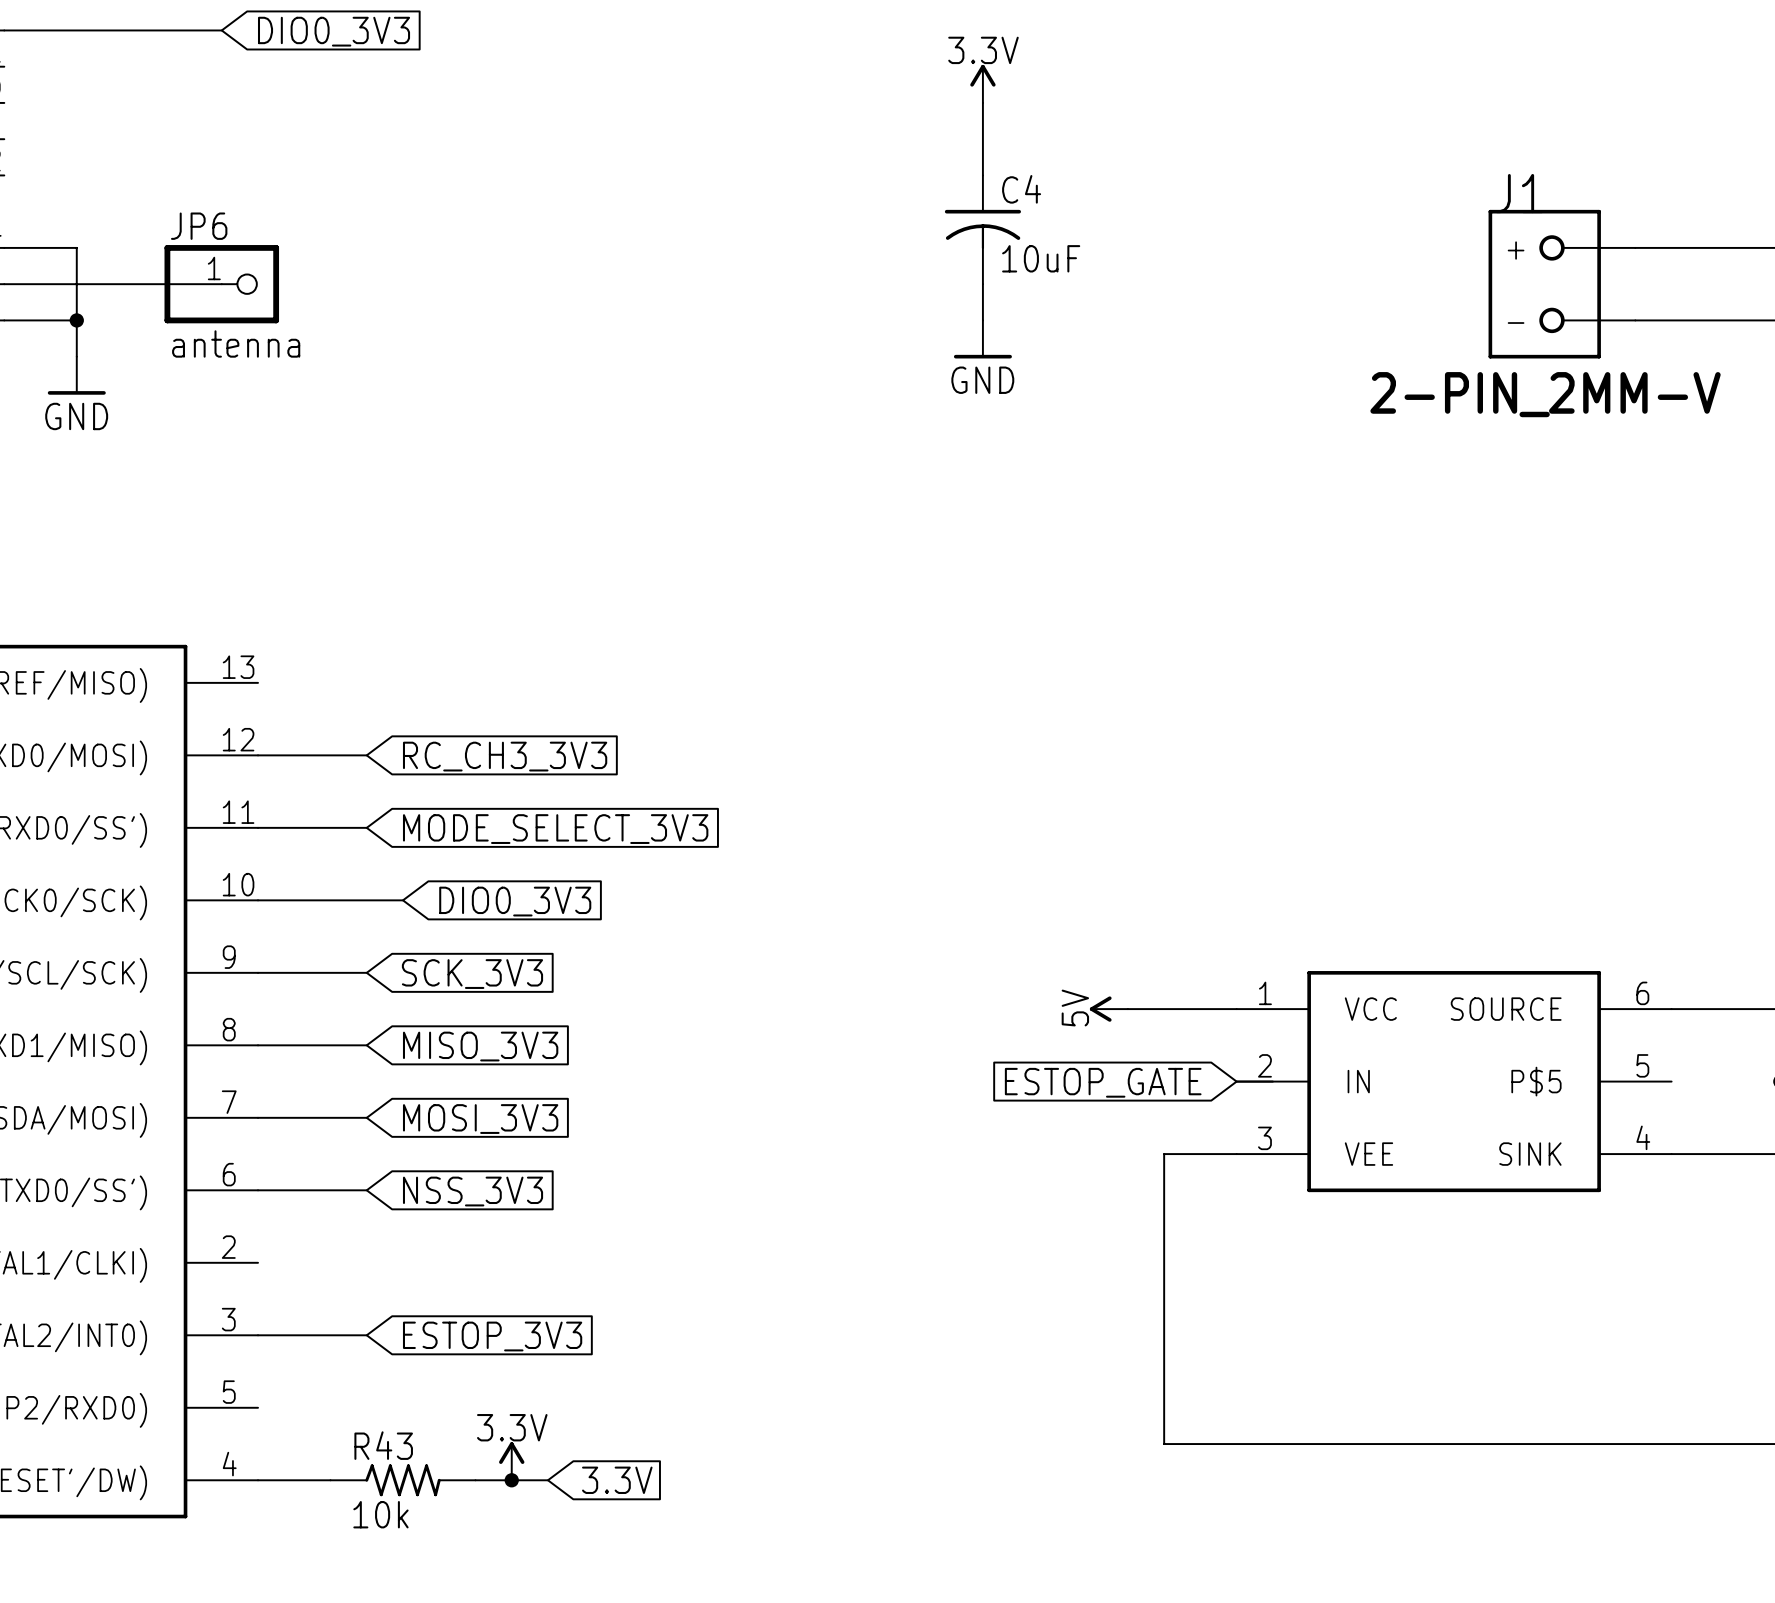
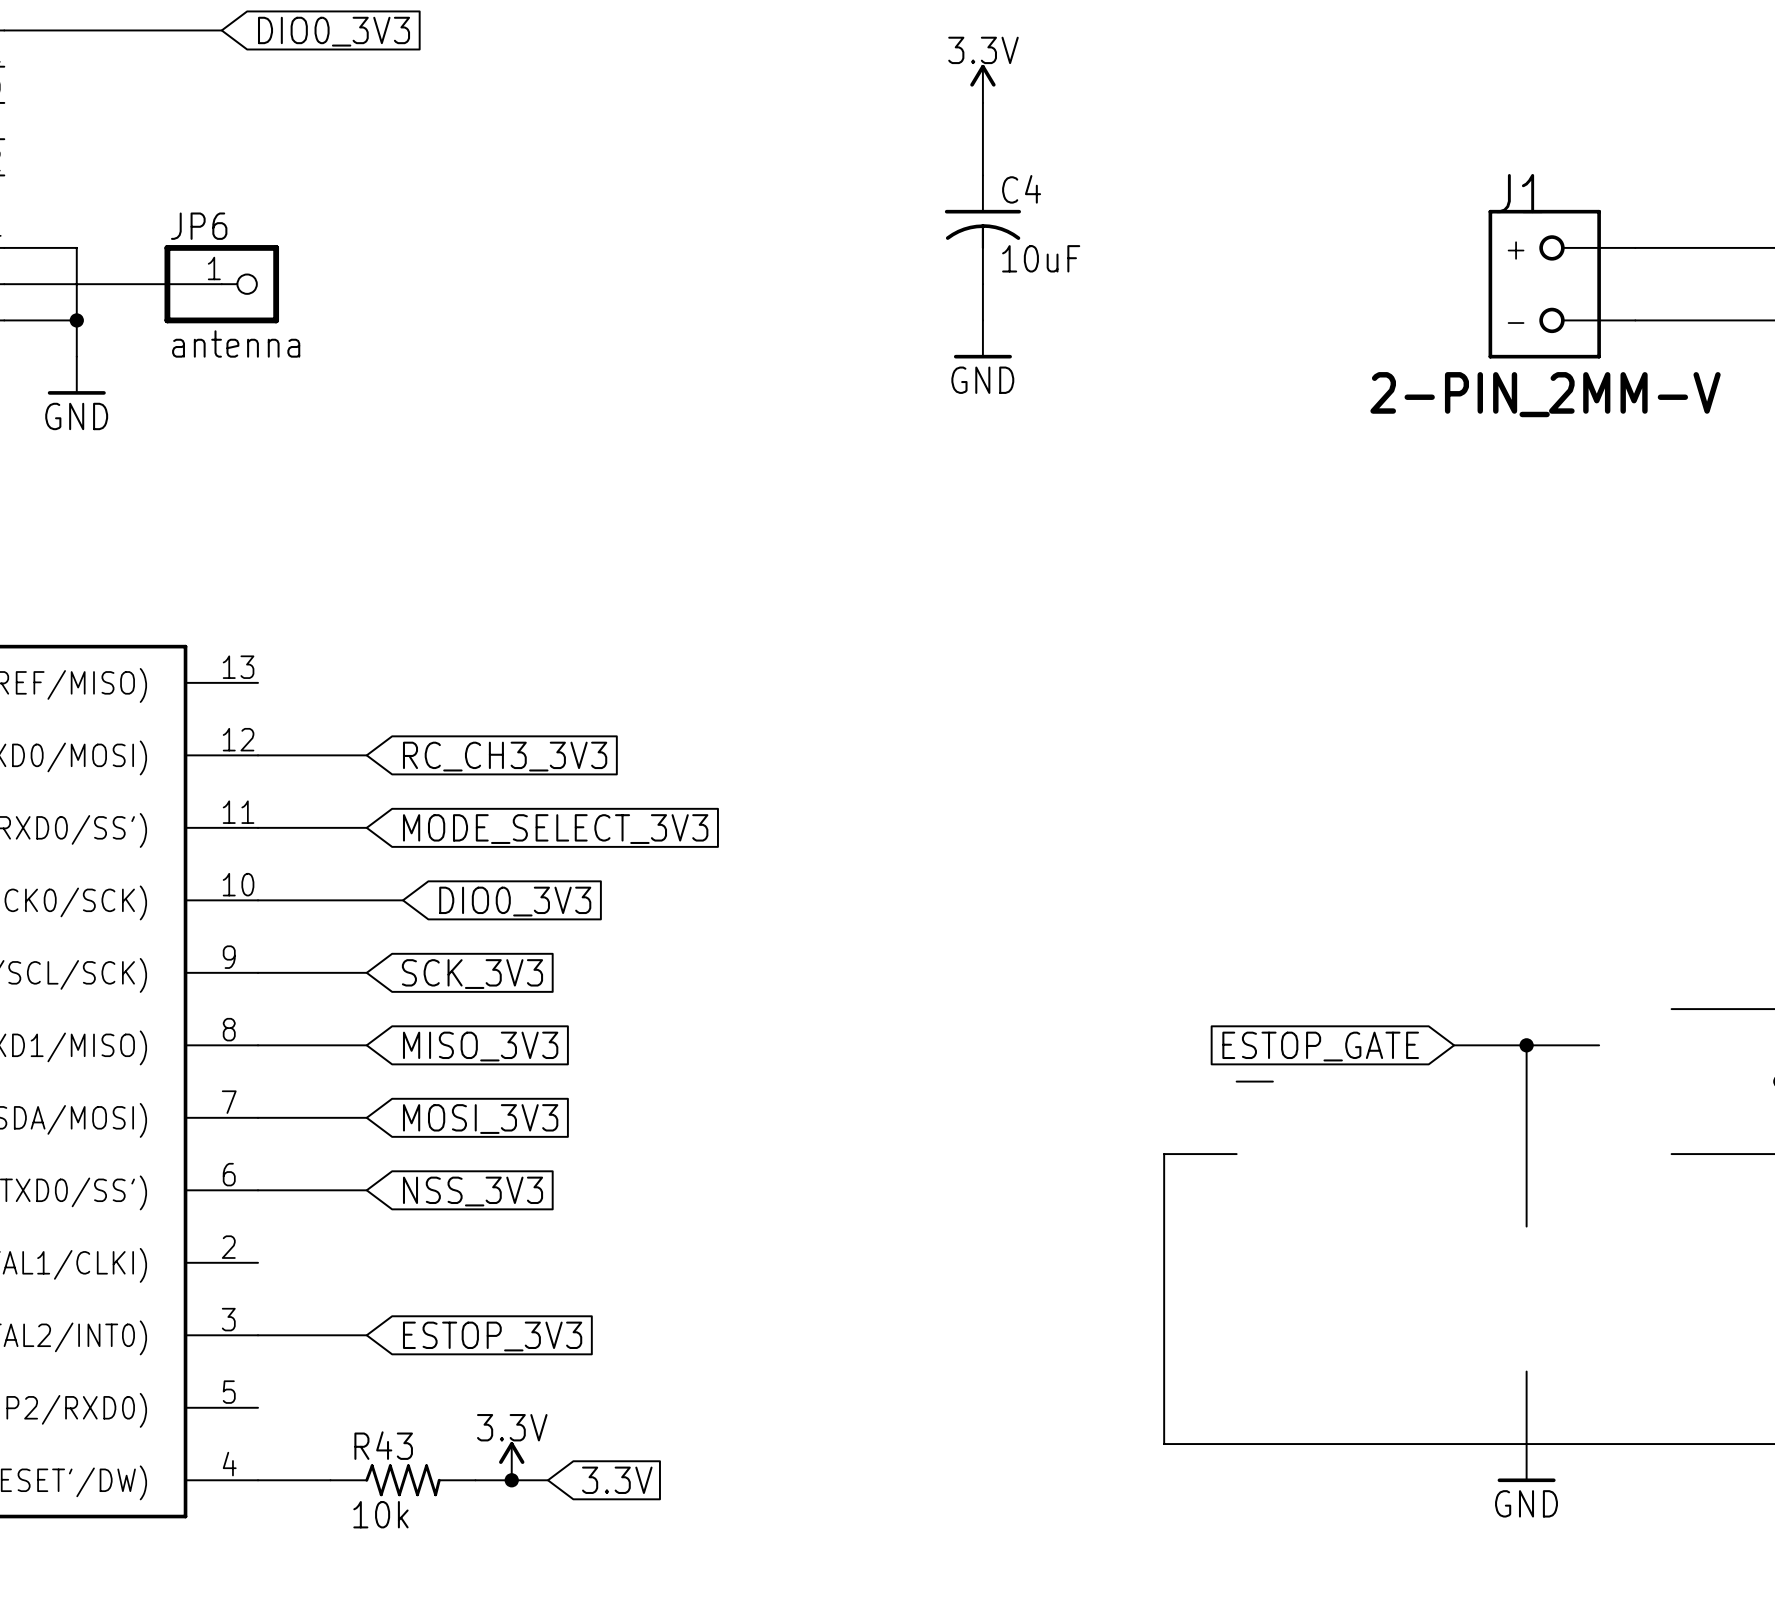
power symbol: 5V (1108, 1009) -> none
wire: (1127, 1009) (1236, 1009) -> none
wire: none -> (1454, 1045) (1599, 1045)
wire: none -> (1526, 1045) (1526, 1226)
junction: none -> (1526, 1045)
part: (1454, 1081) -> none
global label position: ESTOP_GATE (1103, 1082) -> ESTOP_GATE (1320, 1046)
wire: none -> (1526, 1371) (1526, 1444)
power symbol: none -> GND (1526, 1463)

